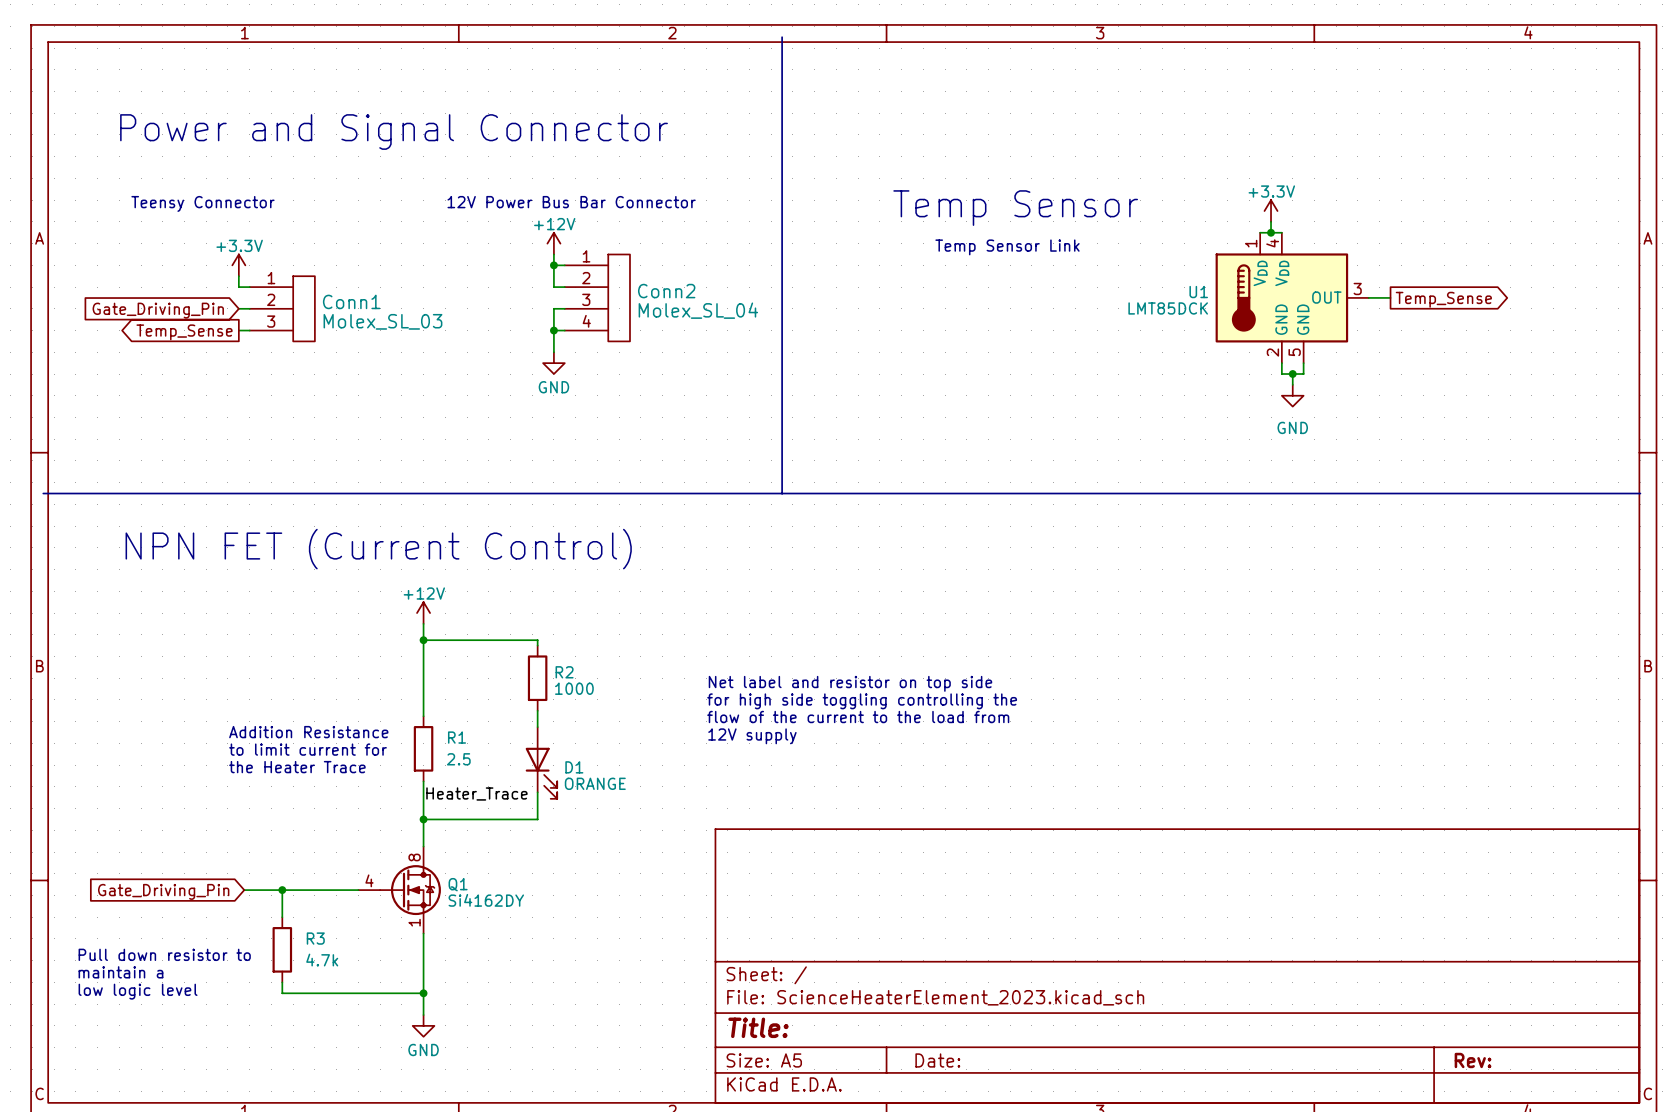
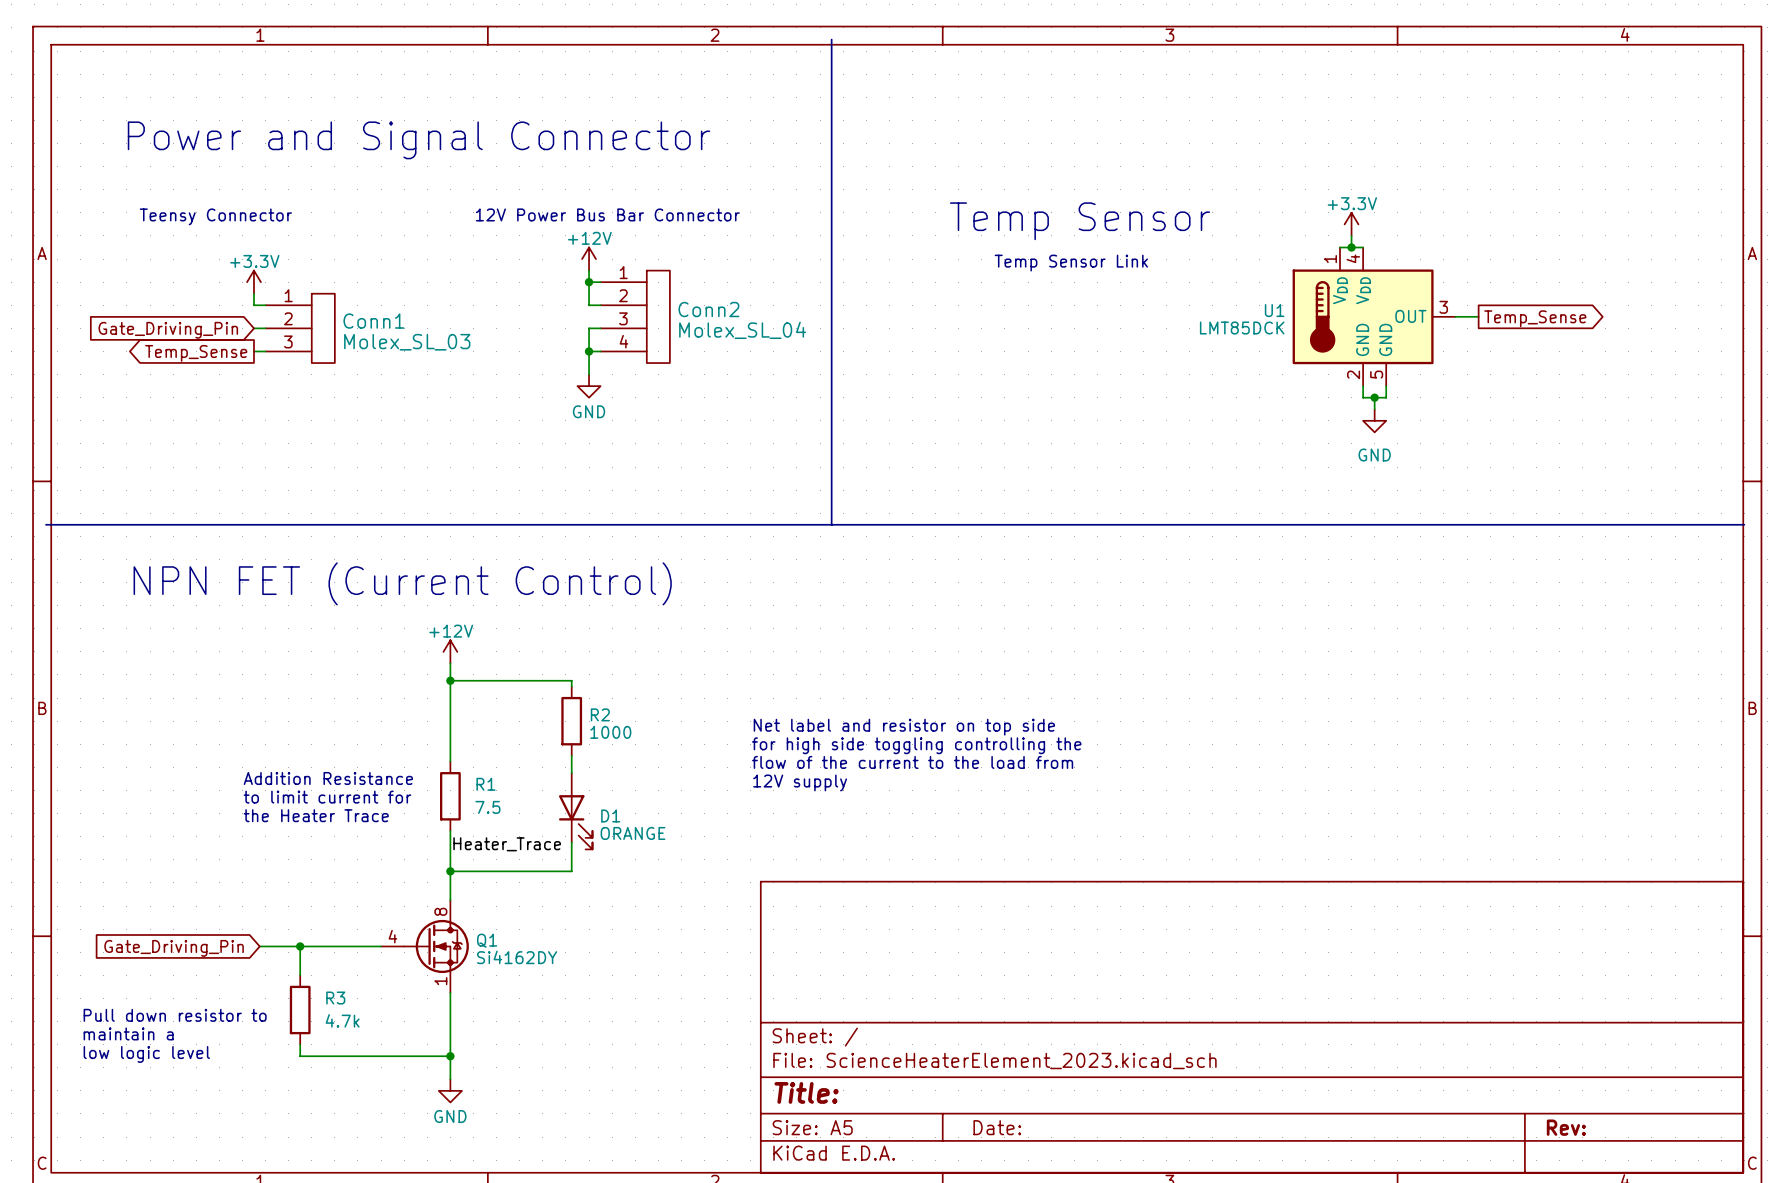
R1 value: 2.5 (458, 759) -> 7.5 (487, 807)

